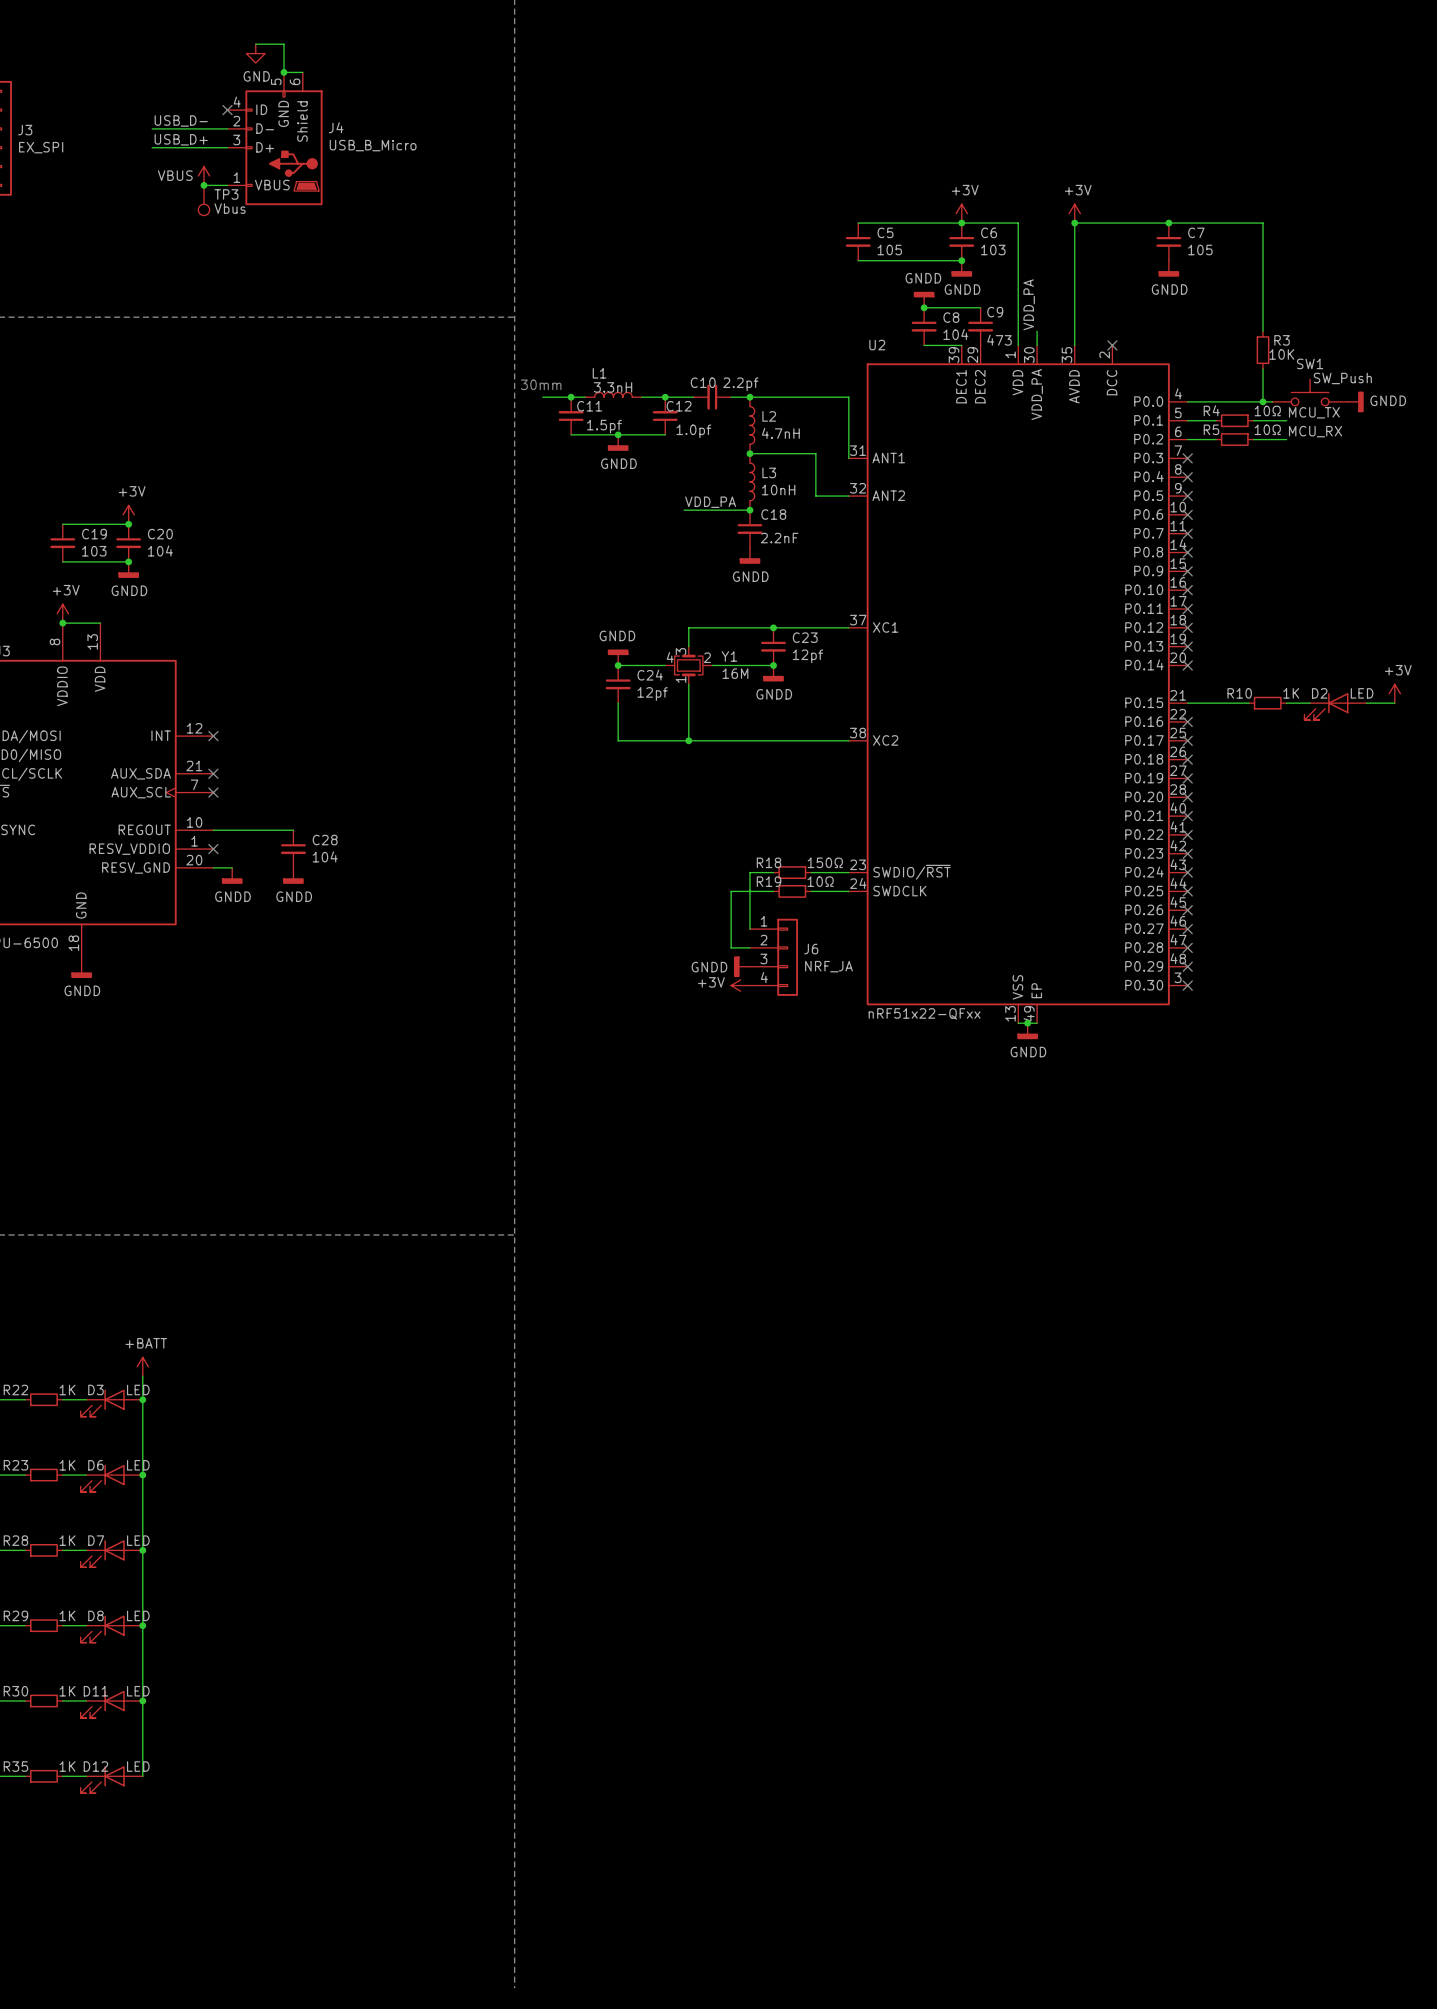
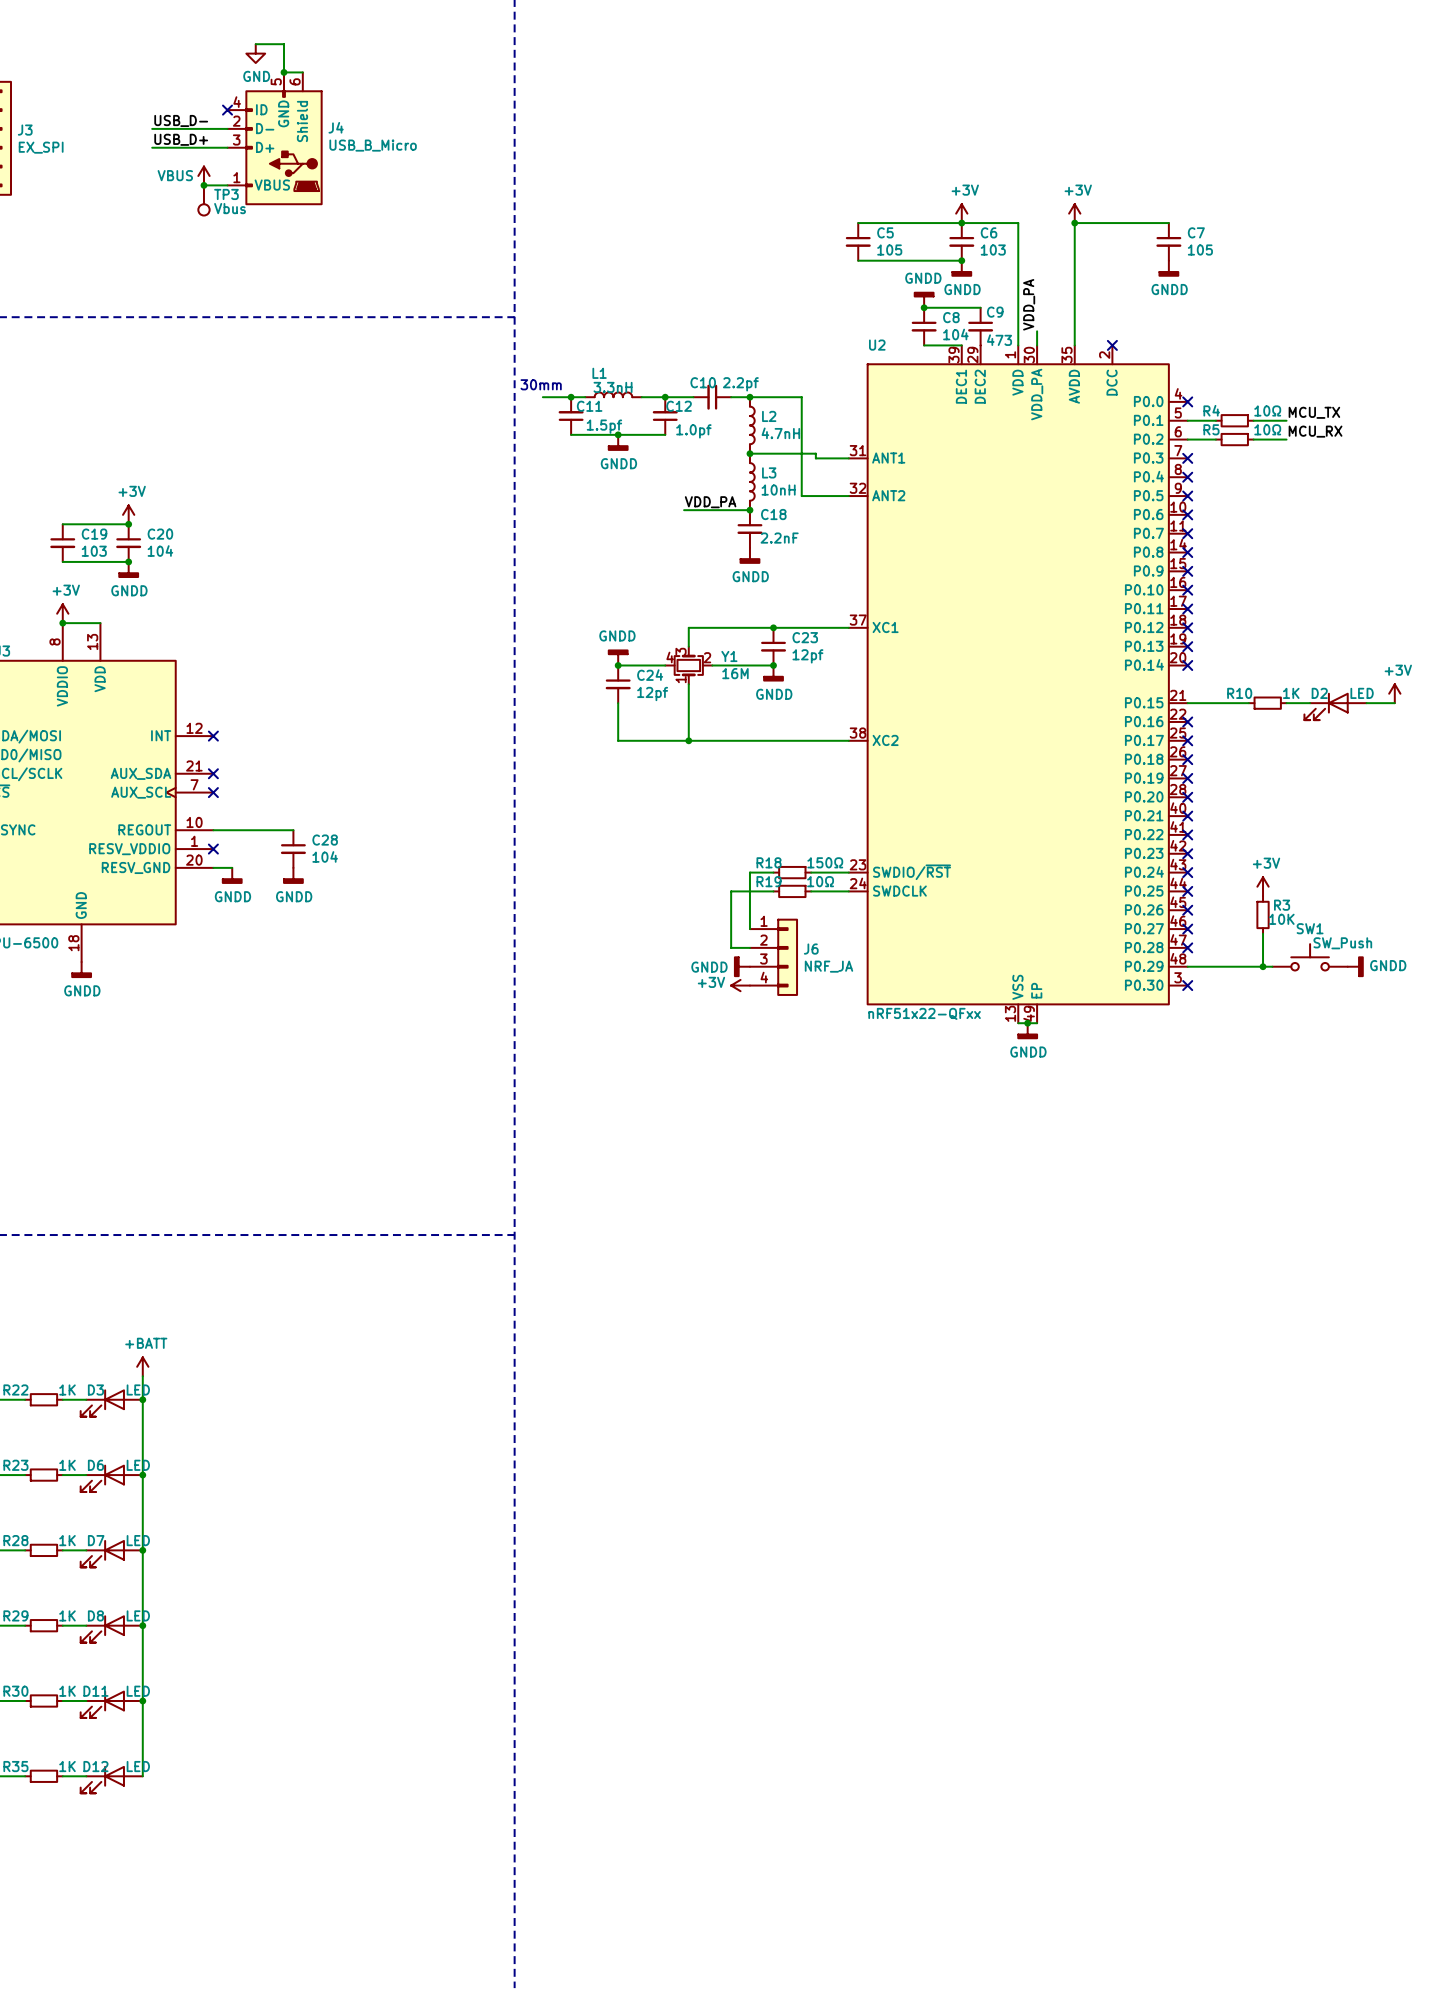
wire: (1168, 223) (1263, 223) (1263, 331) -> none
junction: (1168, 223) -> none
R3 position: (1263, 350) -> (1263, 914)
wire: (1263, 368) (1263, 401) -> none
SW1 position: (1310, 392) -> (1310, 957)
wire: (801, 397) (848, 397) (848, 458) -> (801, 397) (801, 496) (815, 496)
wire: (1187, 401) (1272, 401) -> none
no-connect mark: none -> (1187, 401)
junction: (1263, 401) -> none
power symbol: GNDD (1355, 401) -> none
wire: (815, 458) (815, 496) -> (815, 458) (848, 458)
power symbol: none -> +3V (1263, 886)
wire: none -> (1263, 933) (1263, 966)
wire: none -> (1187, 966) (1272, 966)
no-connect mark: (1187, 966) -> none
junction: none -> (1263, 966)
power symbol: none -> GNDD (1355, 966)

